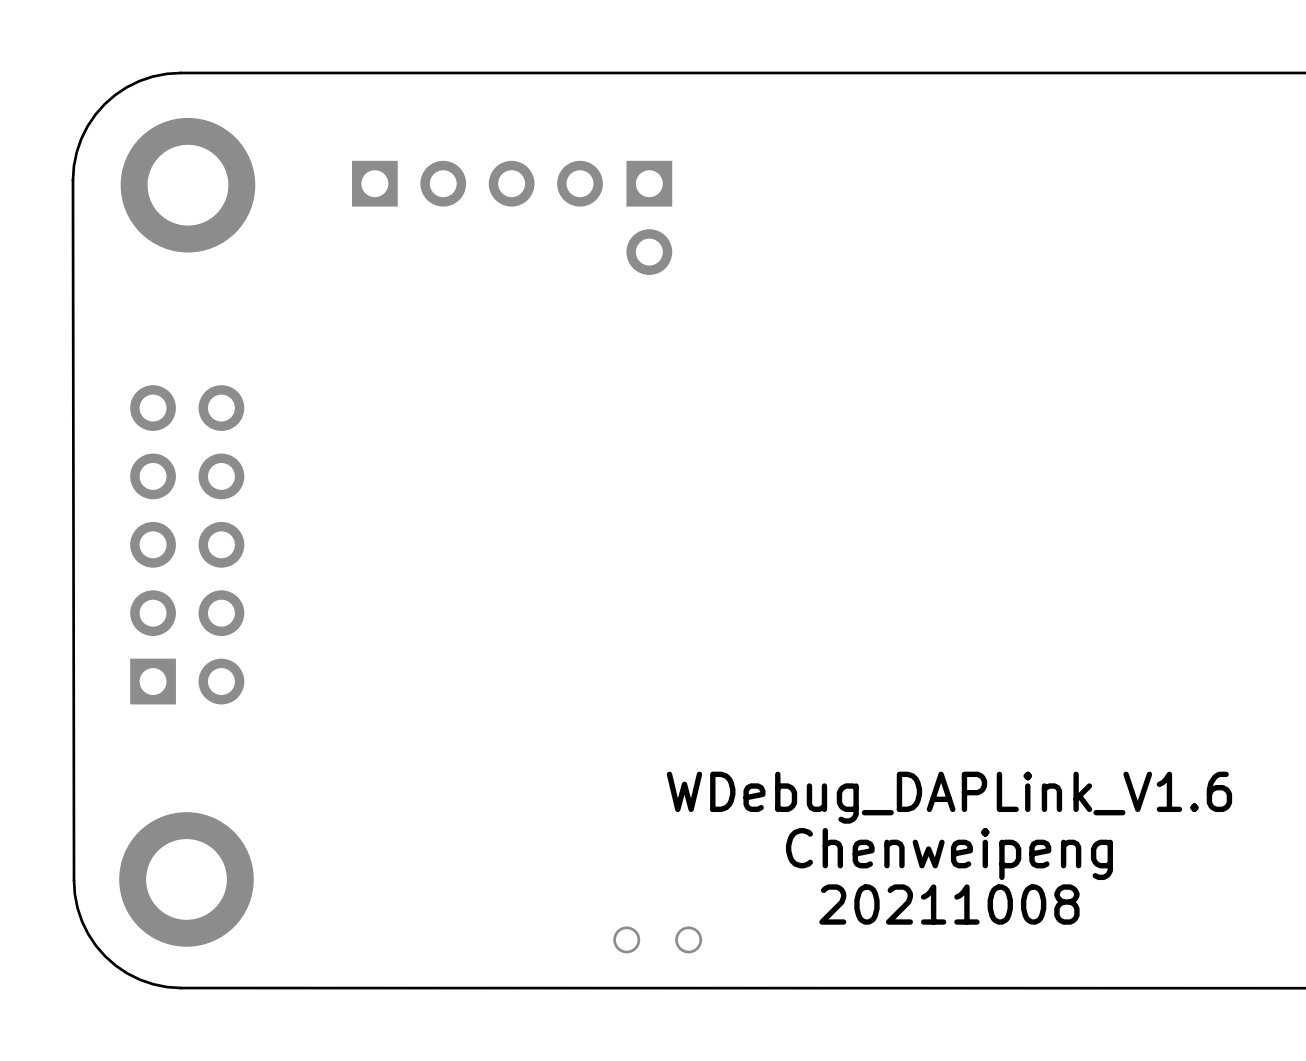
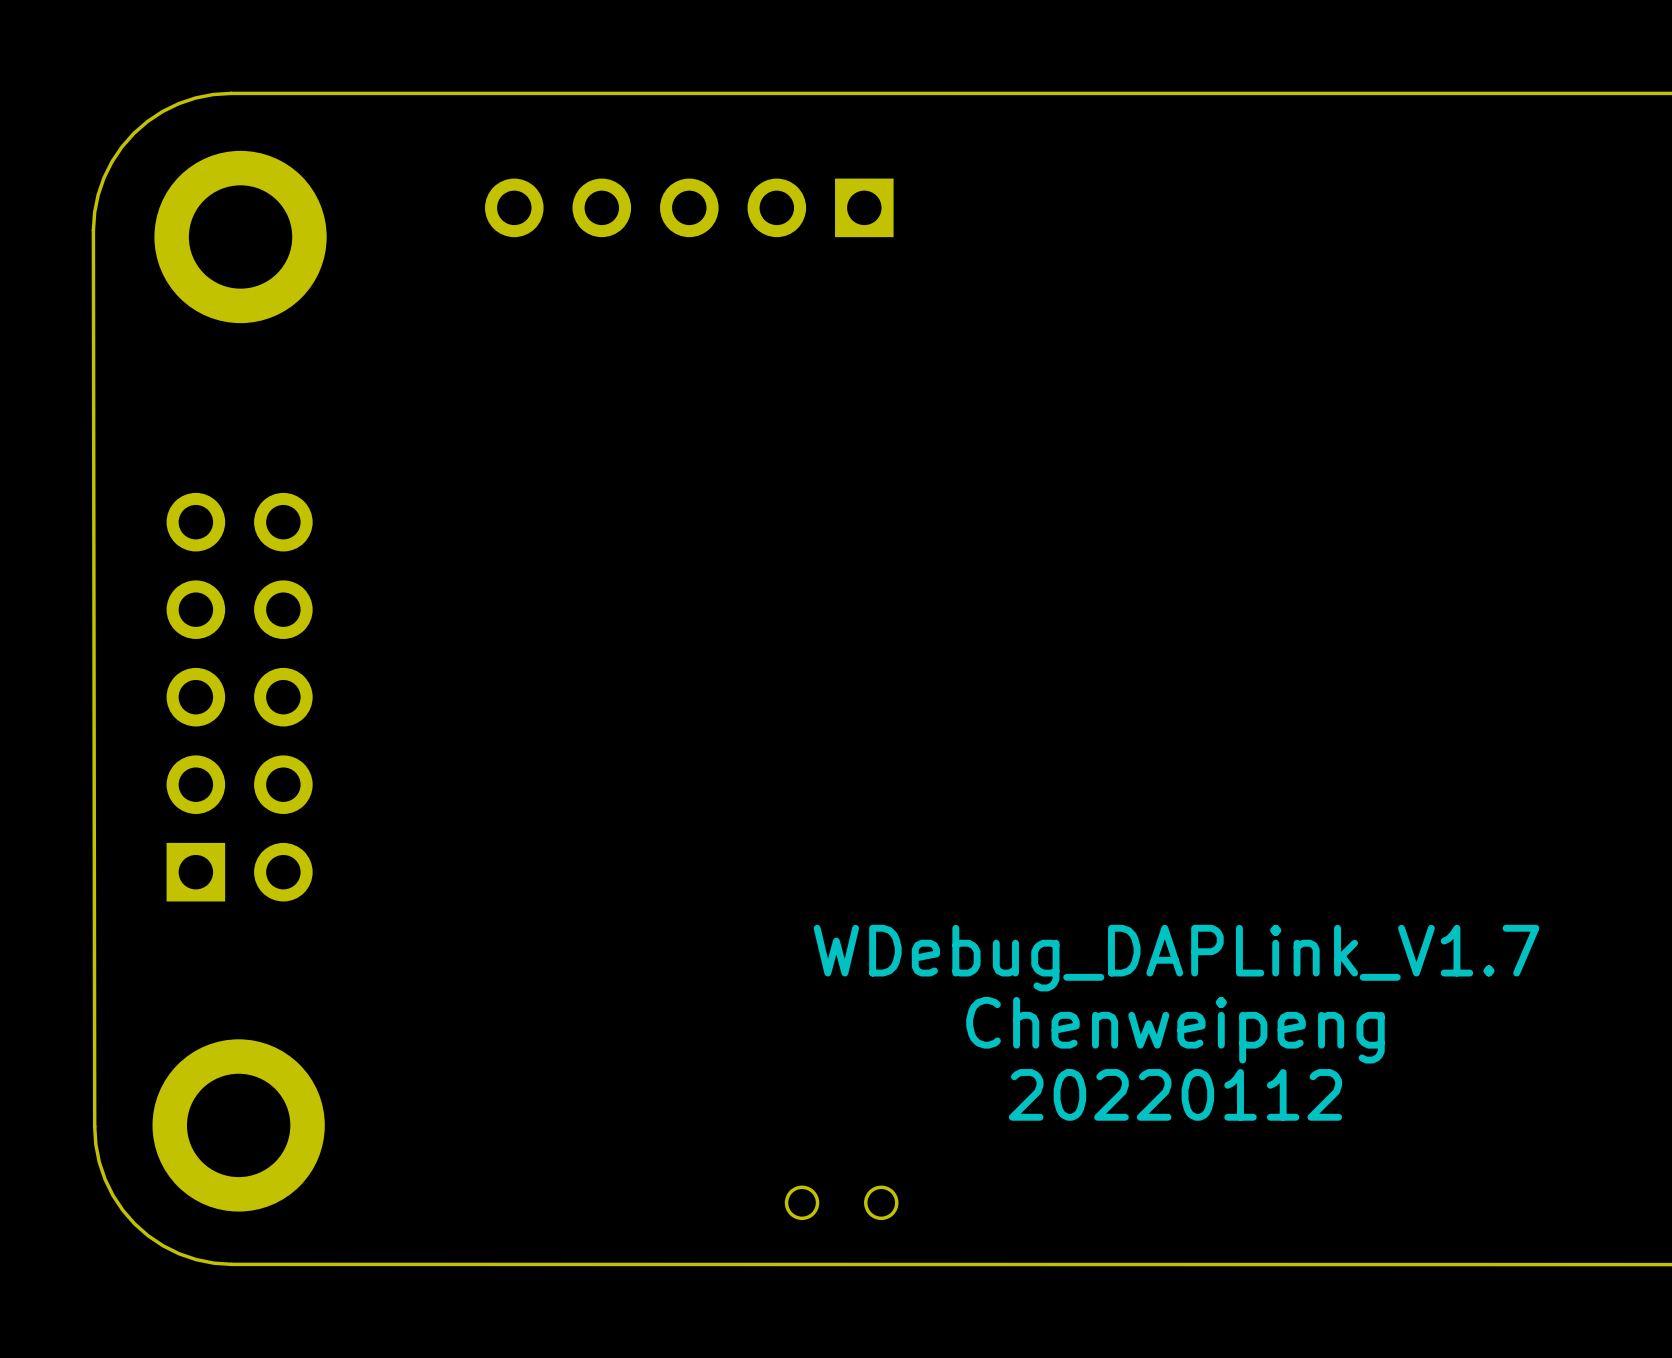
part: none -> (689, 207)
part: (477, 183) -> none
part: (649, 217) -> none
text: WDebug_DAPLink_V1.6 (949, 797) -> WDebug_DAPLink_V1.7 (1176, 958)
text position: Chenweipeng (949, 854) -> Chenweipeng (1175, 1030)
text: 20211008 (949, 904) -> 20220112 (1175, 1094)

